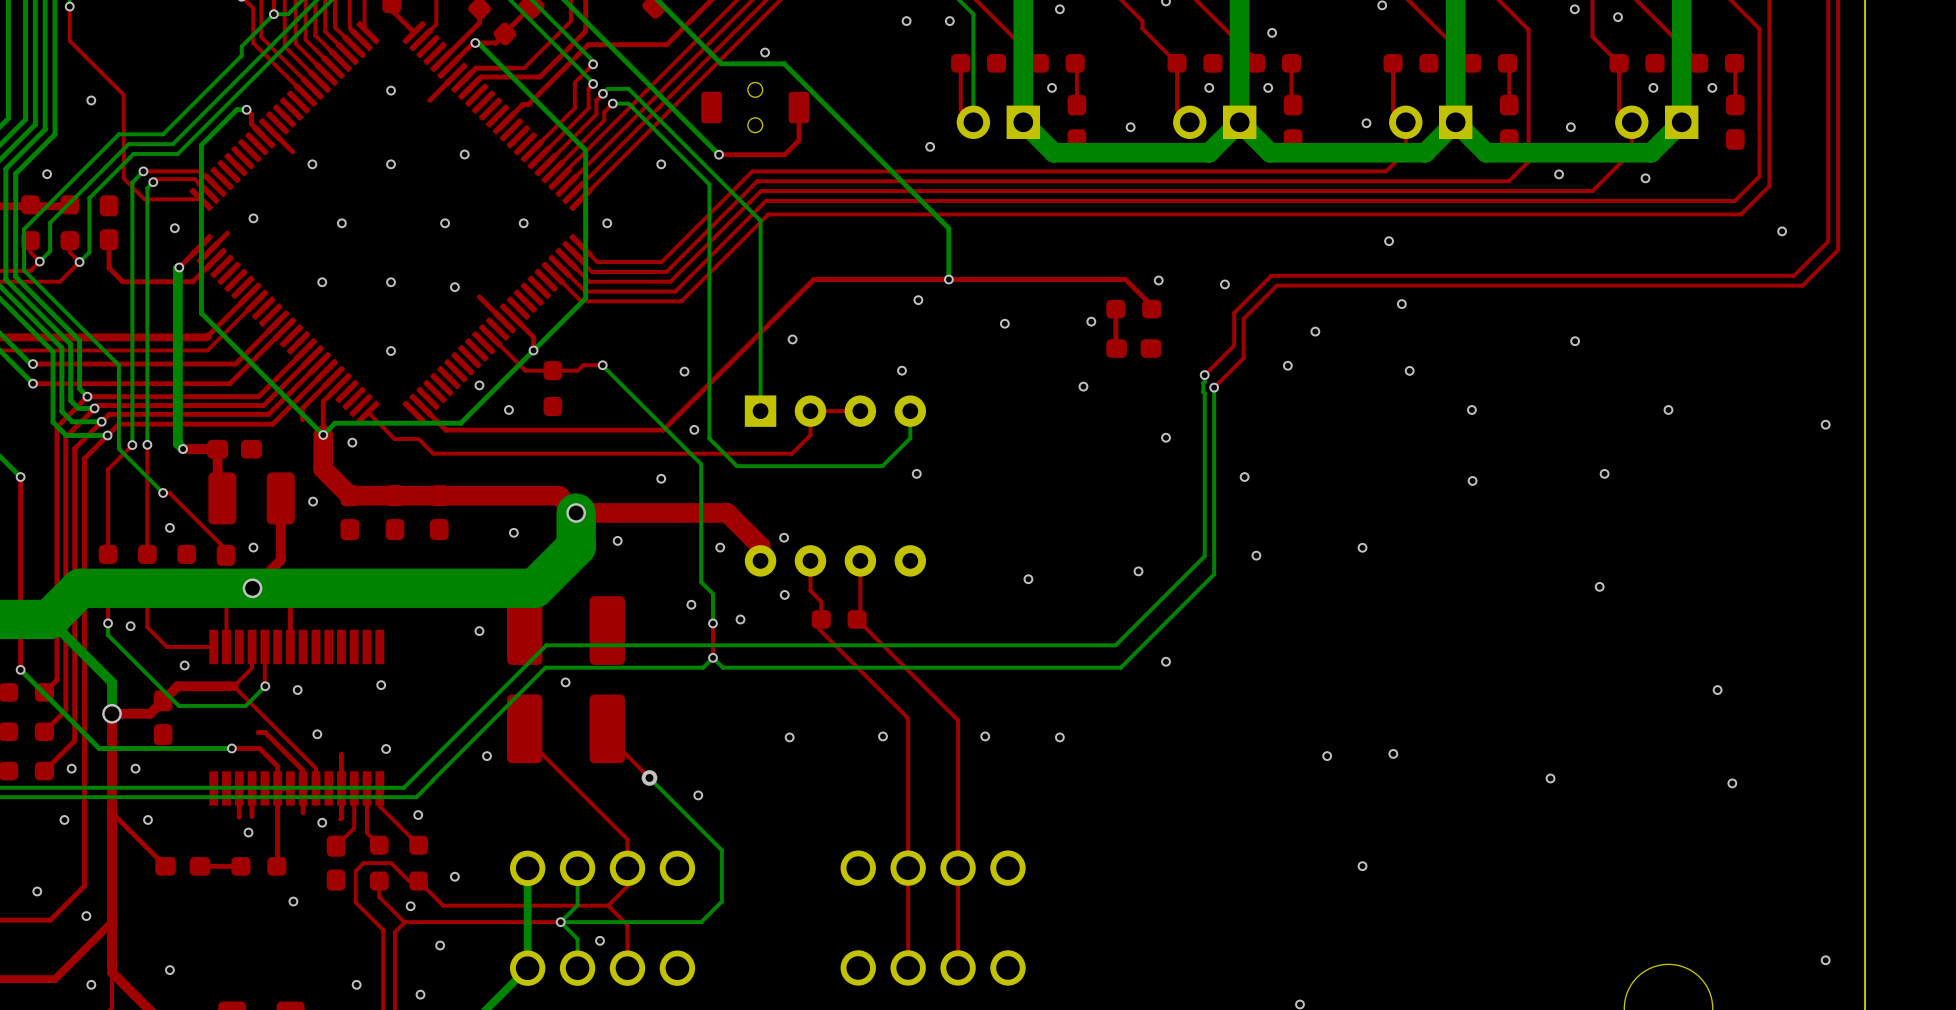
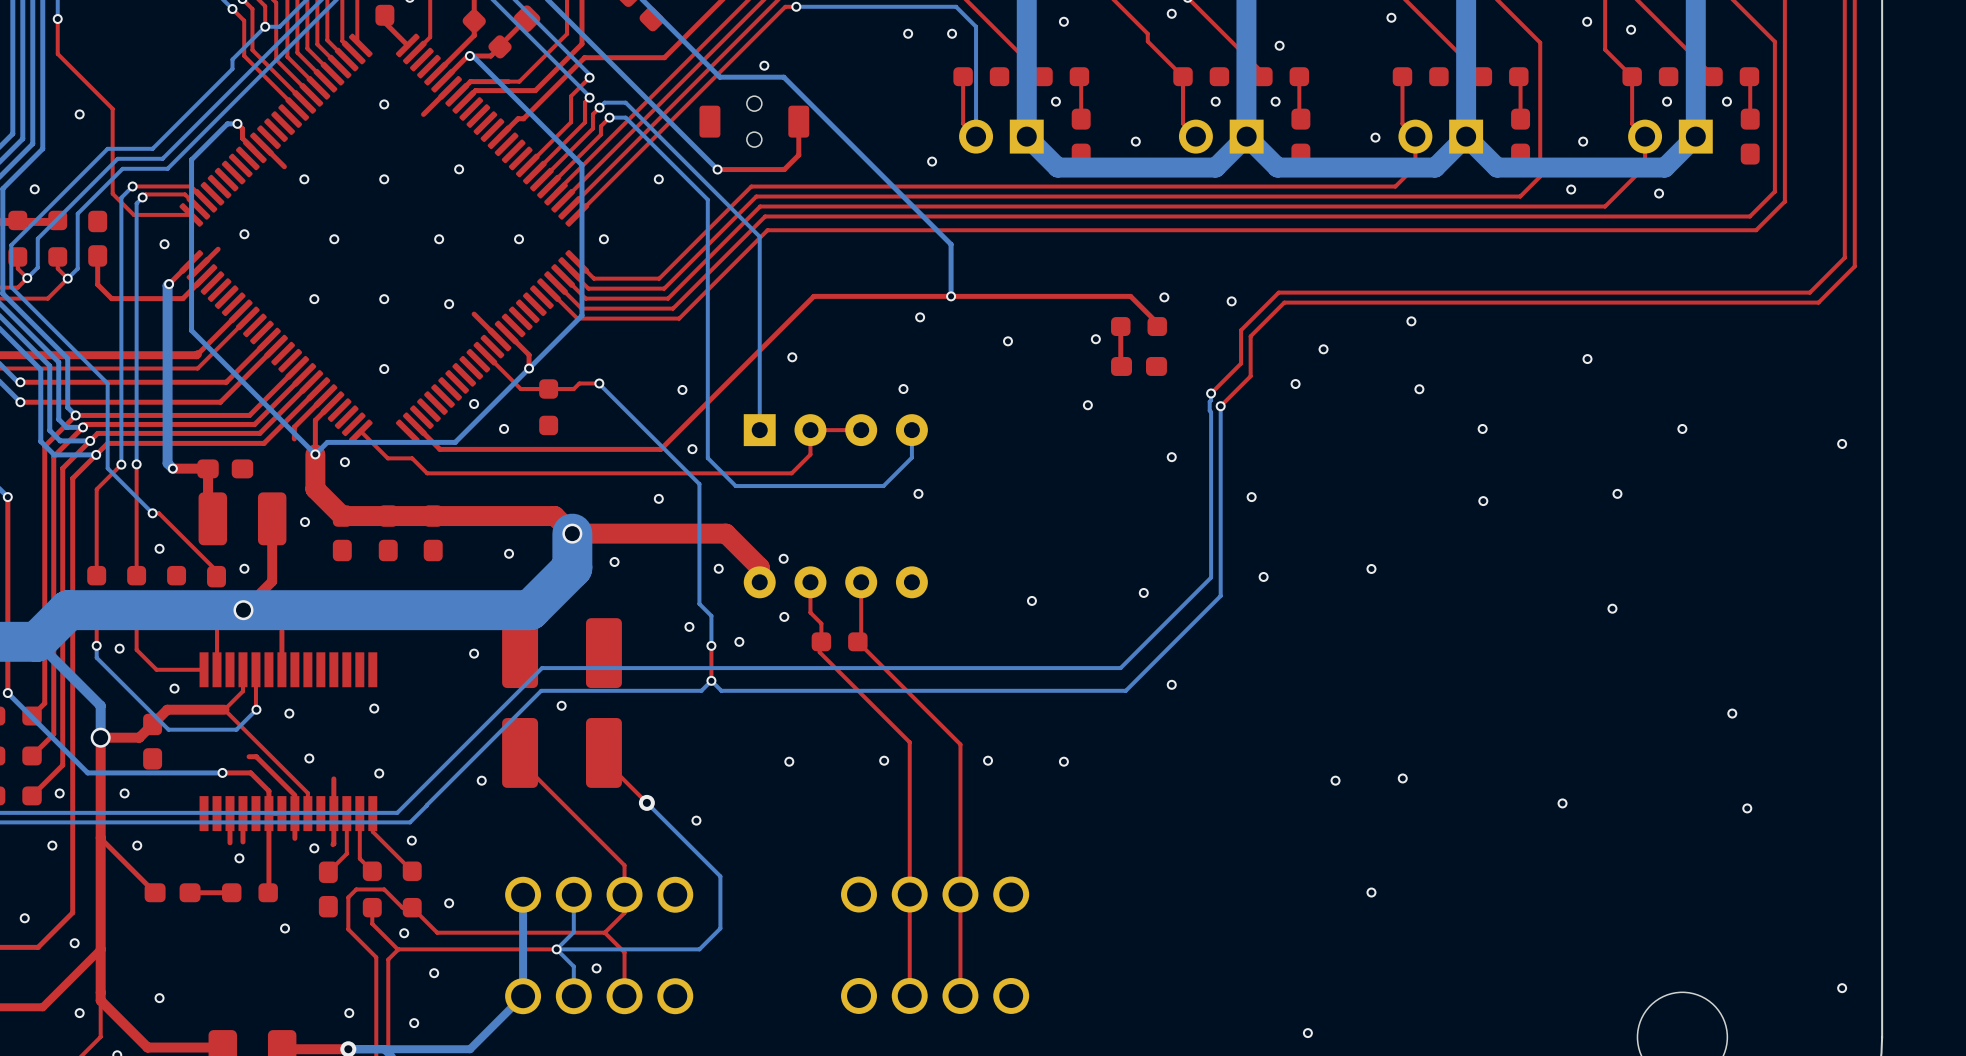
via: (1782, 231) -> none
via: (1389, 241) -> none

